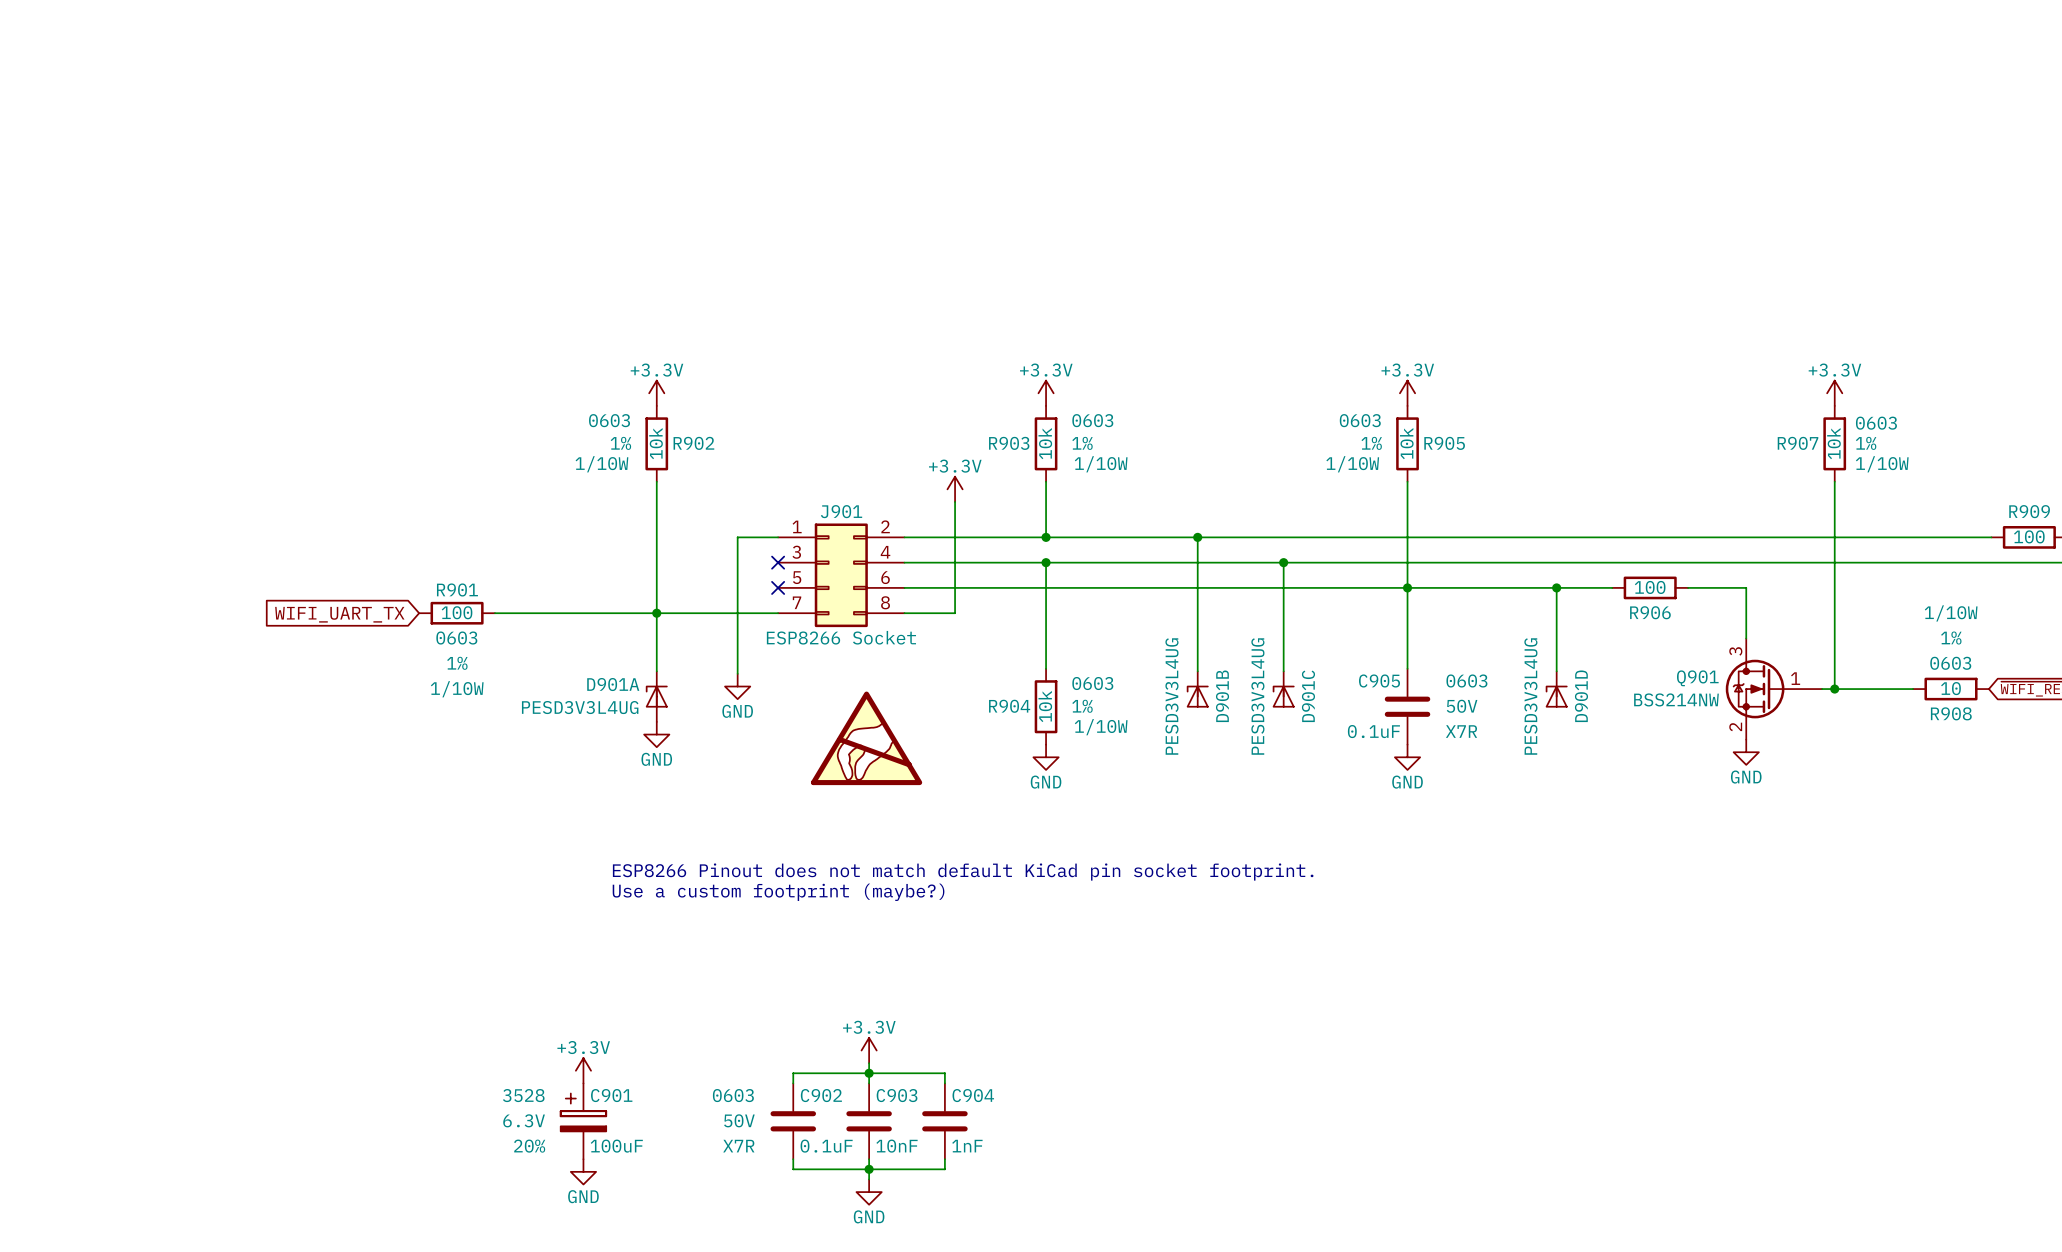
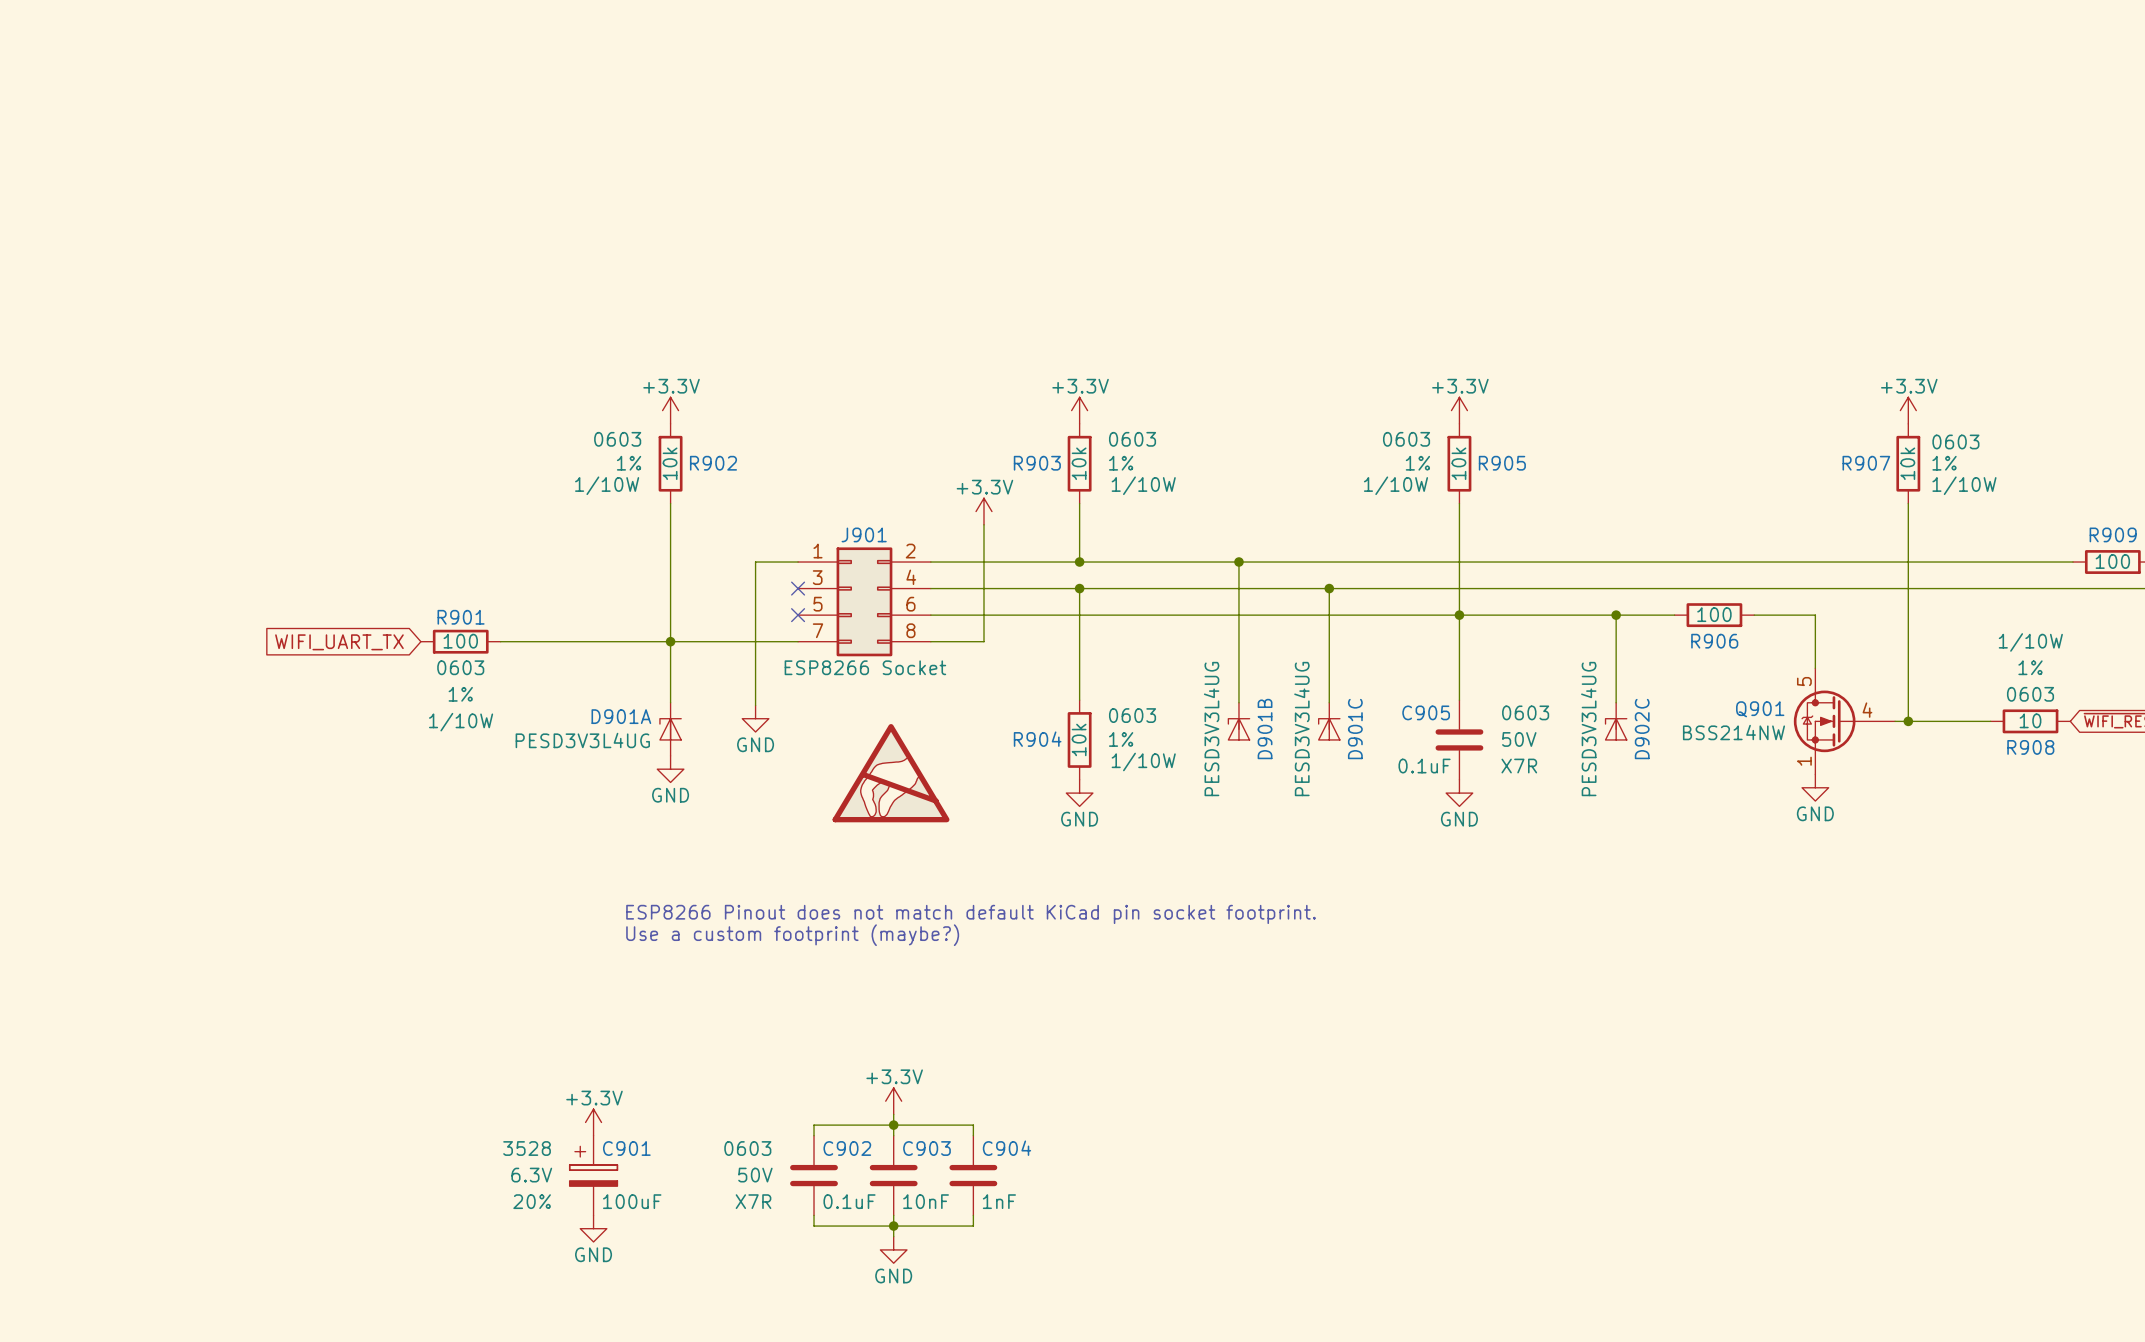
Q901 pin number: 3 (1735, 651) -> 5 (1804, 681)
Q901 pin number: 1 (1795, 678) -> 4 (1867, 710)
D901D name: D901D (1581, 696) -> D902C (1642, 729)
Q901 pin number: 2 (1735, 726) -> 1 (1804, 761)

